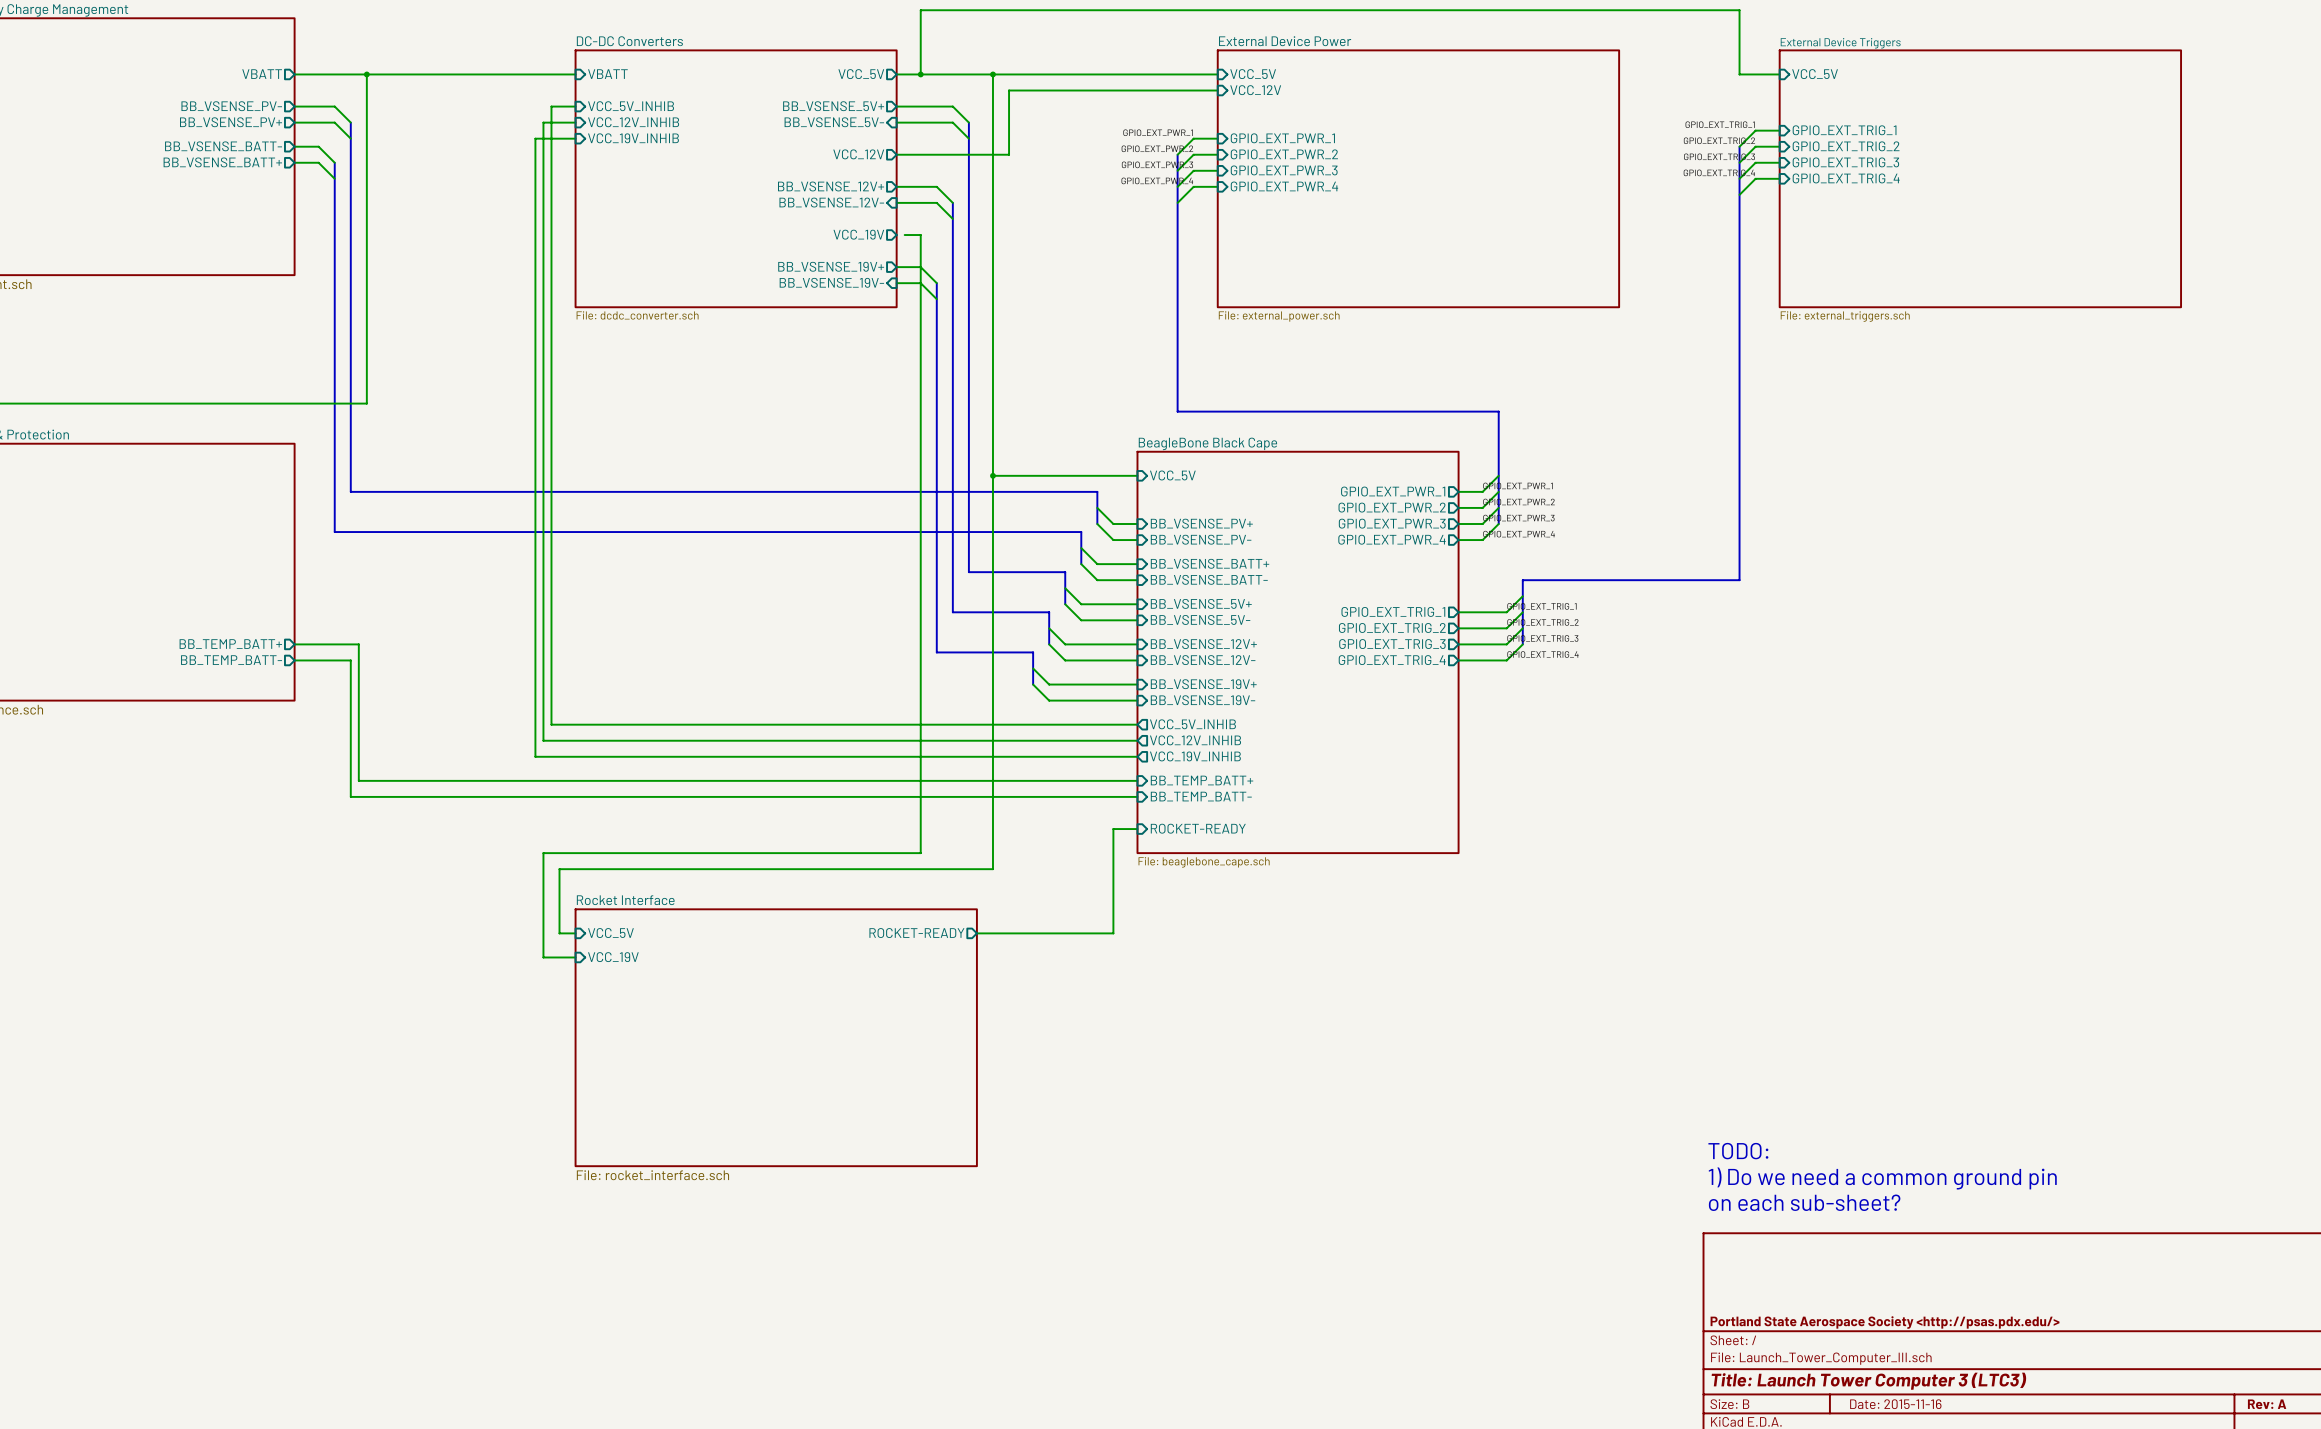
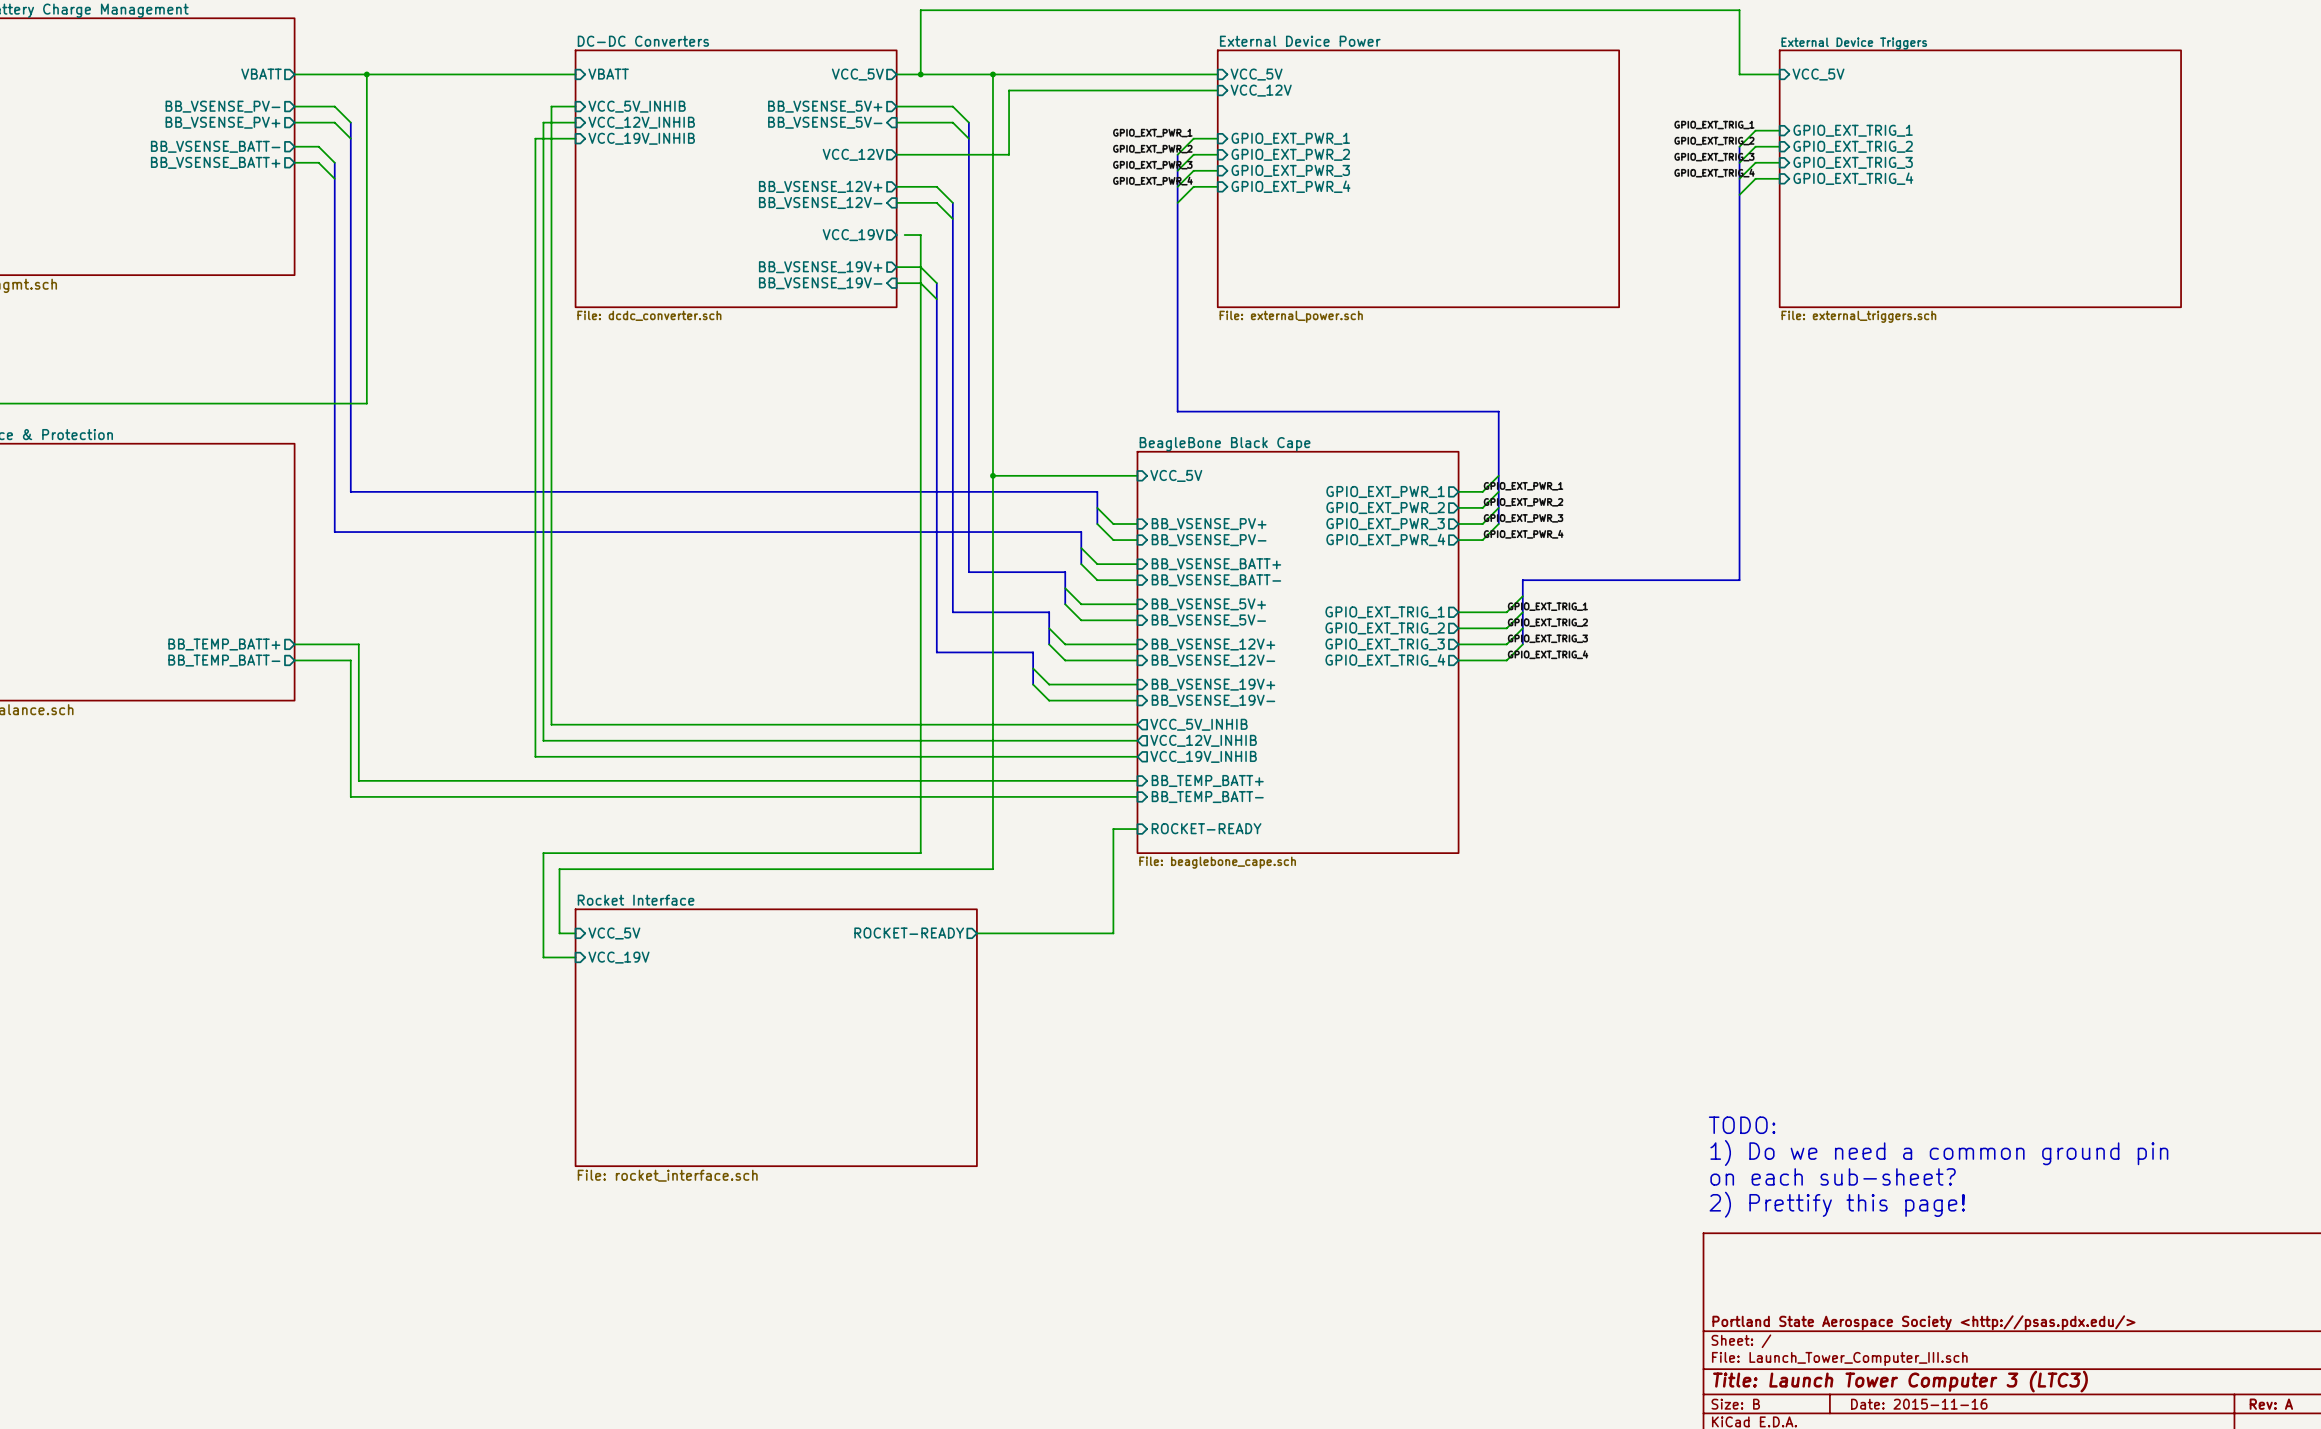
text: none -> TODO: (1742, 1125)
text: TODO: (1738, 1151) -> 1) Do we need a common ground pin (1939, 1153)
text: 1) Do we need a common ground pin (1882, 1178) -> on each sub-sheet? (1833, 1176)
text: on each sub-sheet? (1804, 1202) -> 2) Prettify this page! (1837, 1204)

